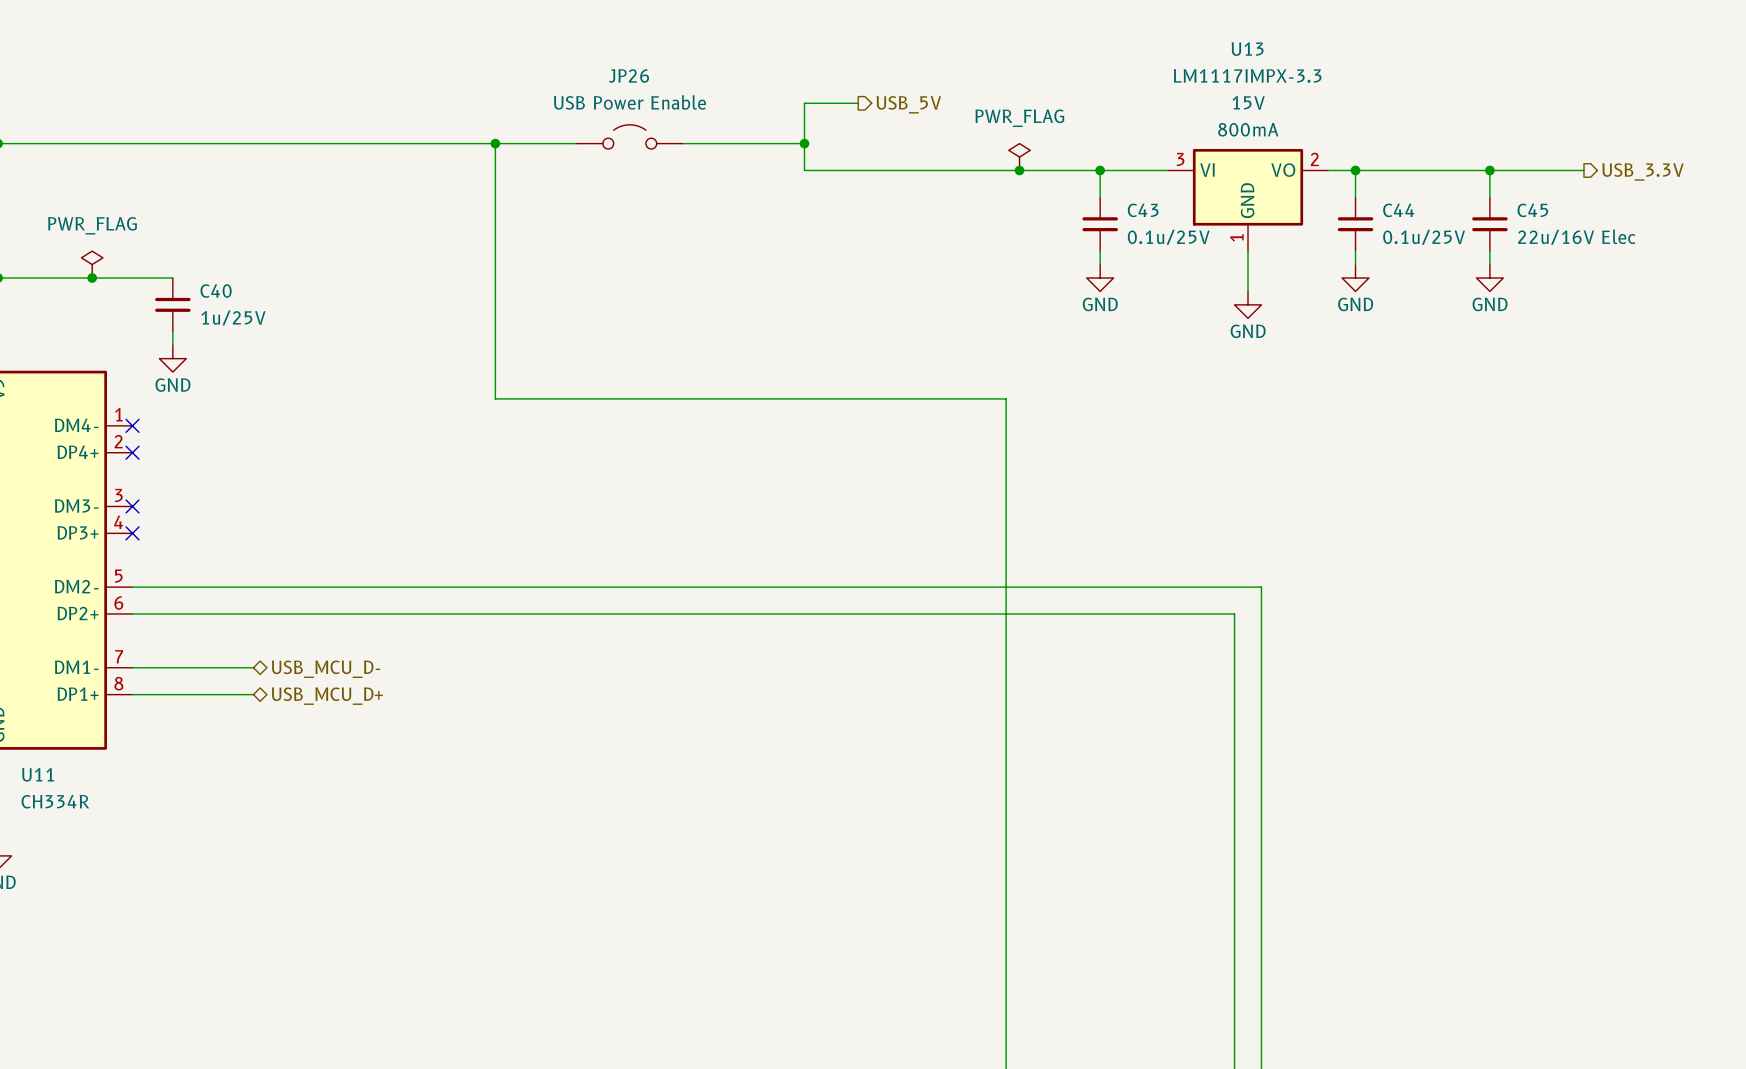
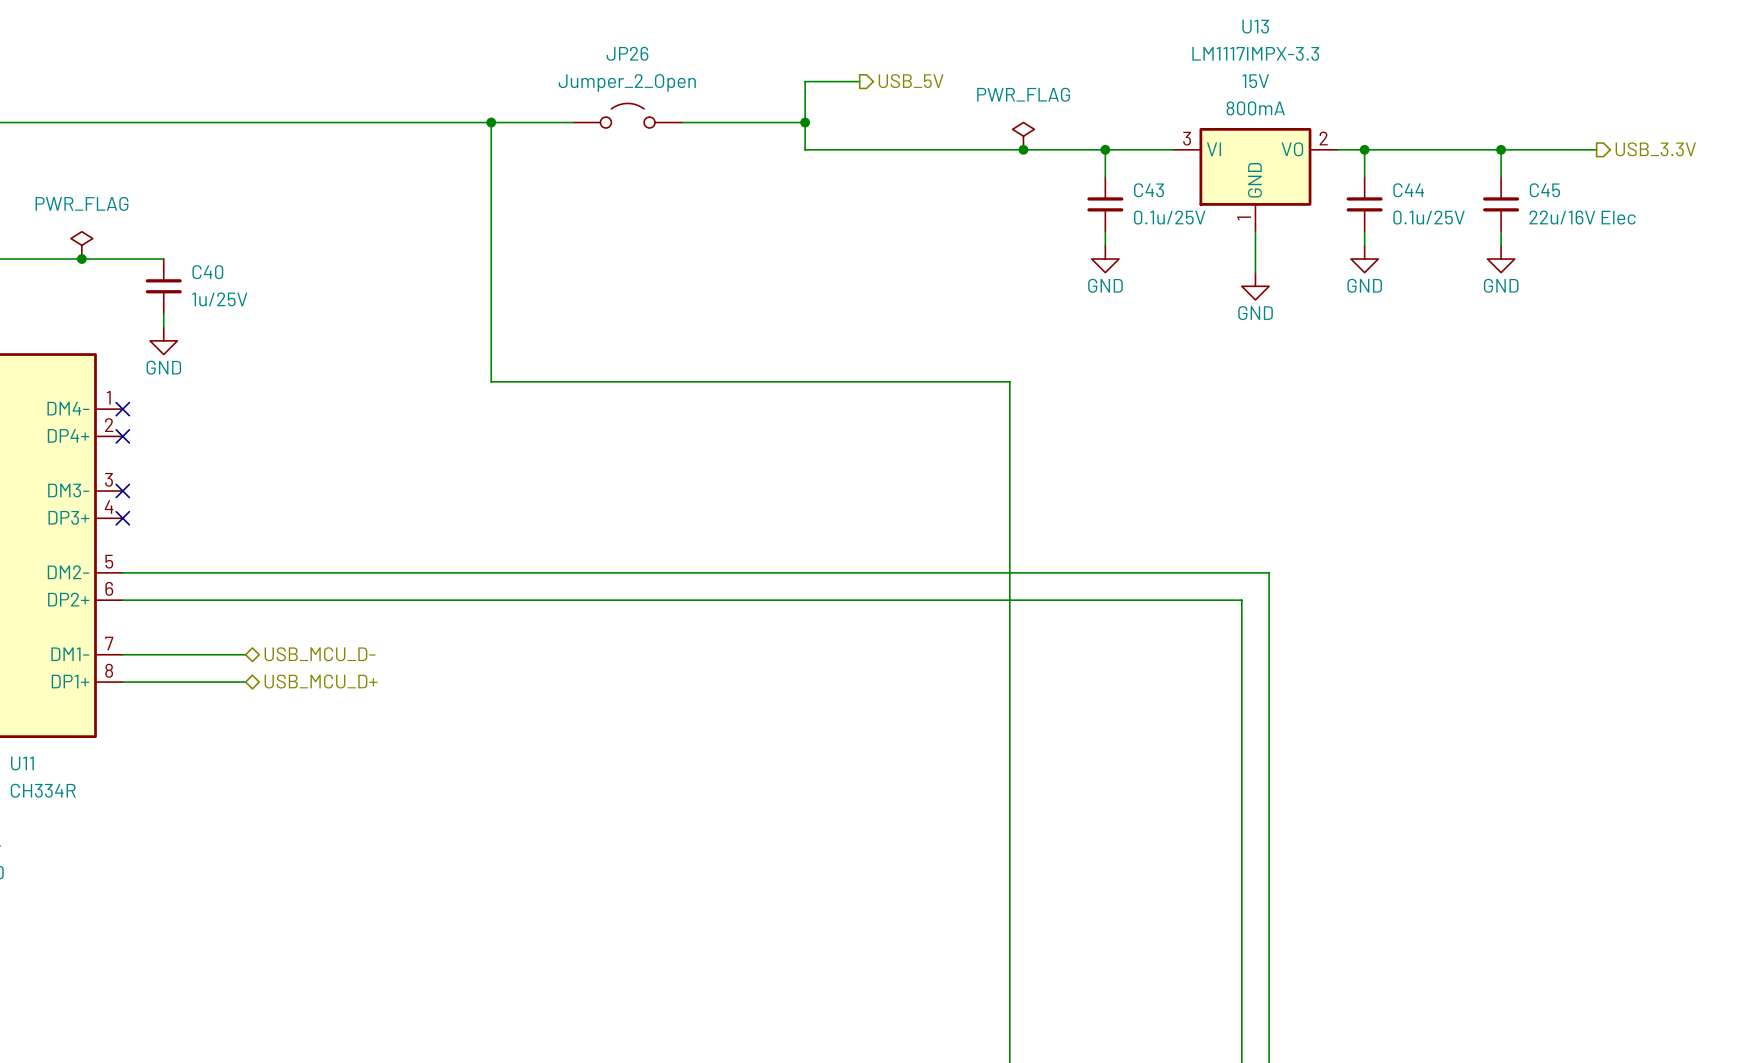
JP26 value: USB Power Enable (629, 102) -> Jumper_2_Open (627, 82)

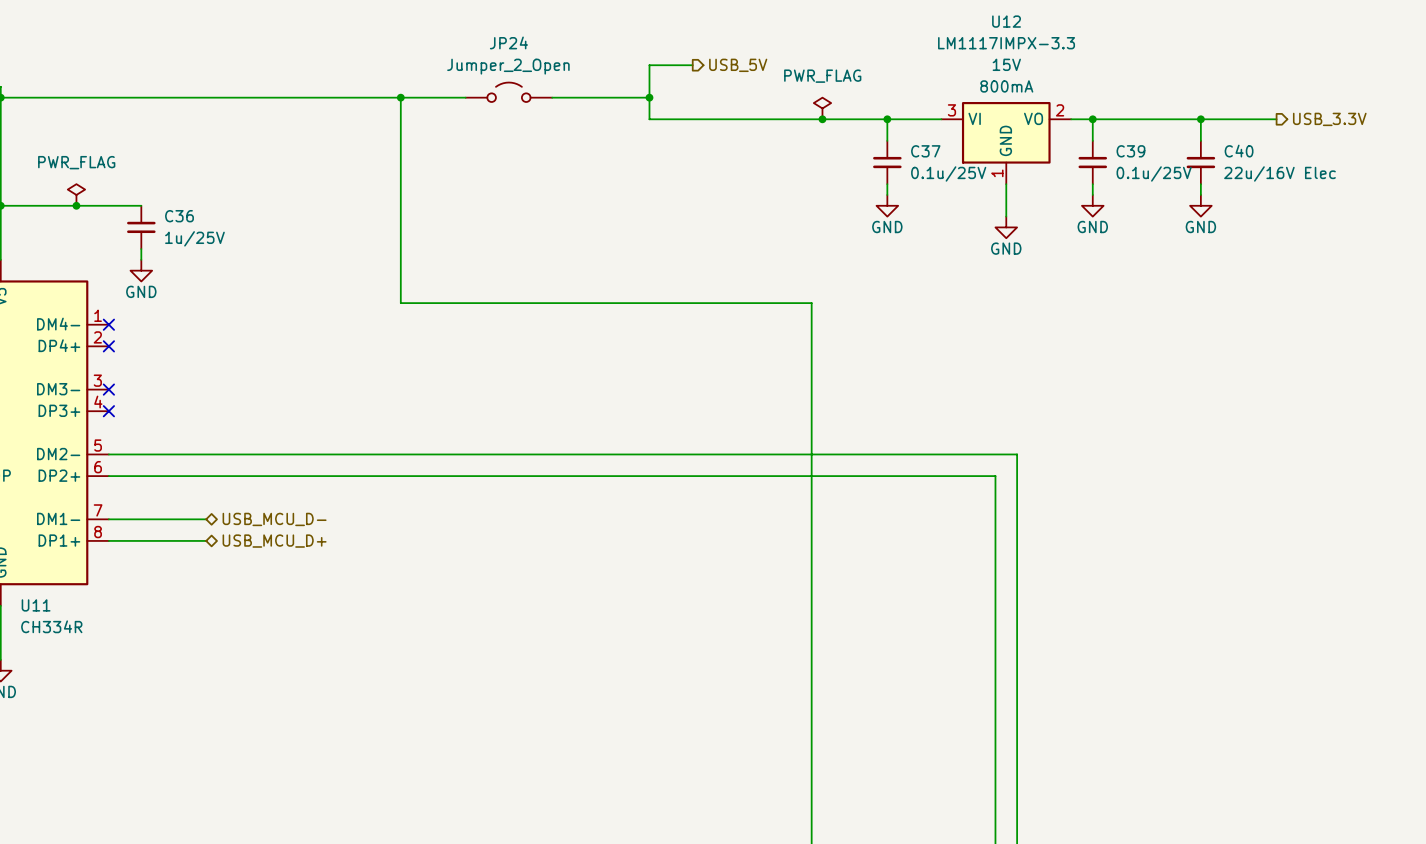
U13 name: U13 (1255, 26) -> U12 (1006, 21)
JP26 name: JP26 (627, 53) -> JP24 (508, 42)
C43 name: C43 (1149, 190) -> C37 (925, 151)
C44 name: C44 (1408, 190) -> C39 (1130, 151)
C45 name: C45 (1544, 190) -> C40 (1239, 151)
C40 name: C40 (207, 272) -> C36 (179, 216)

